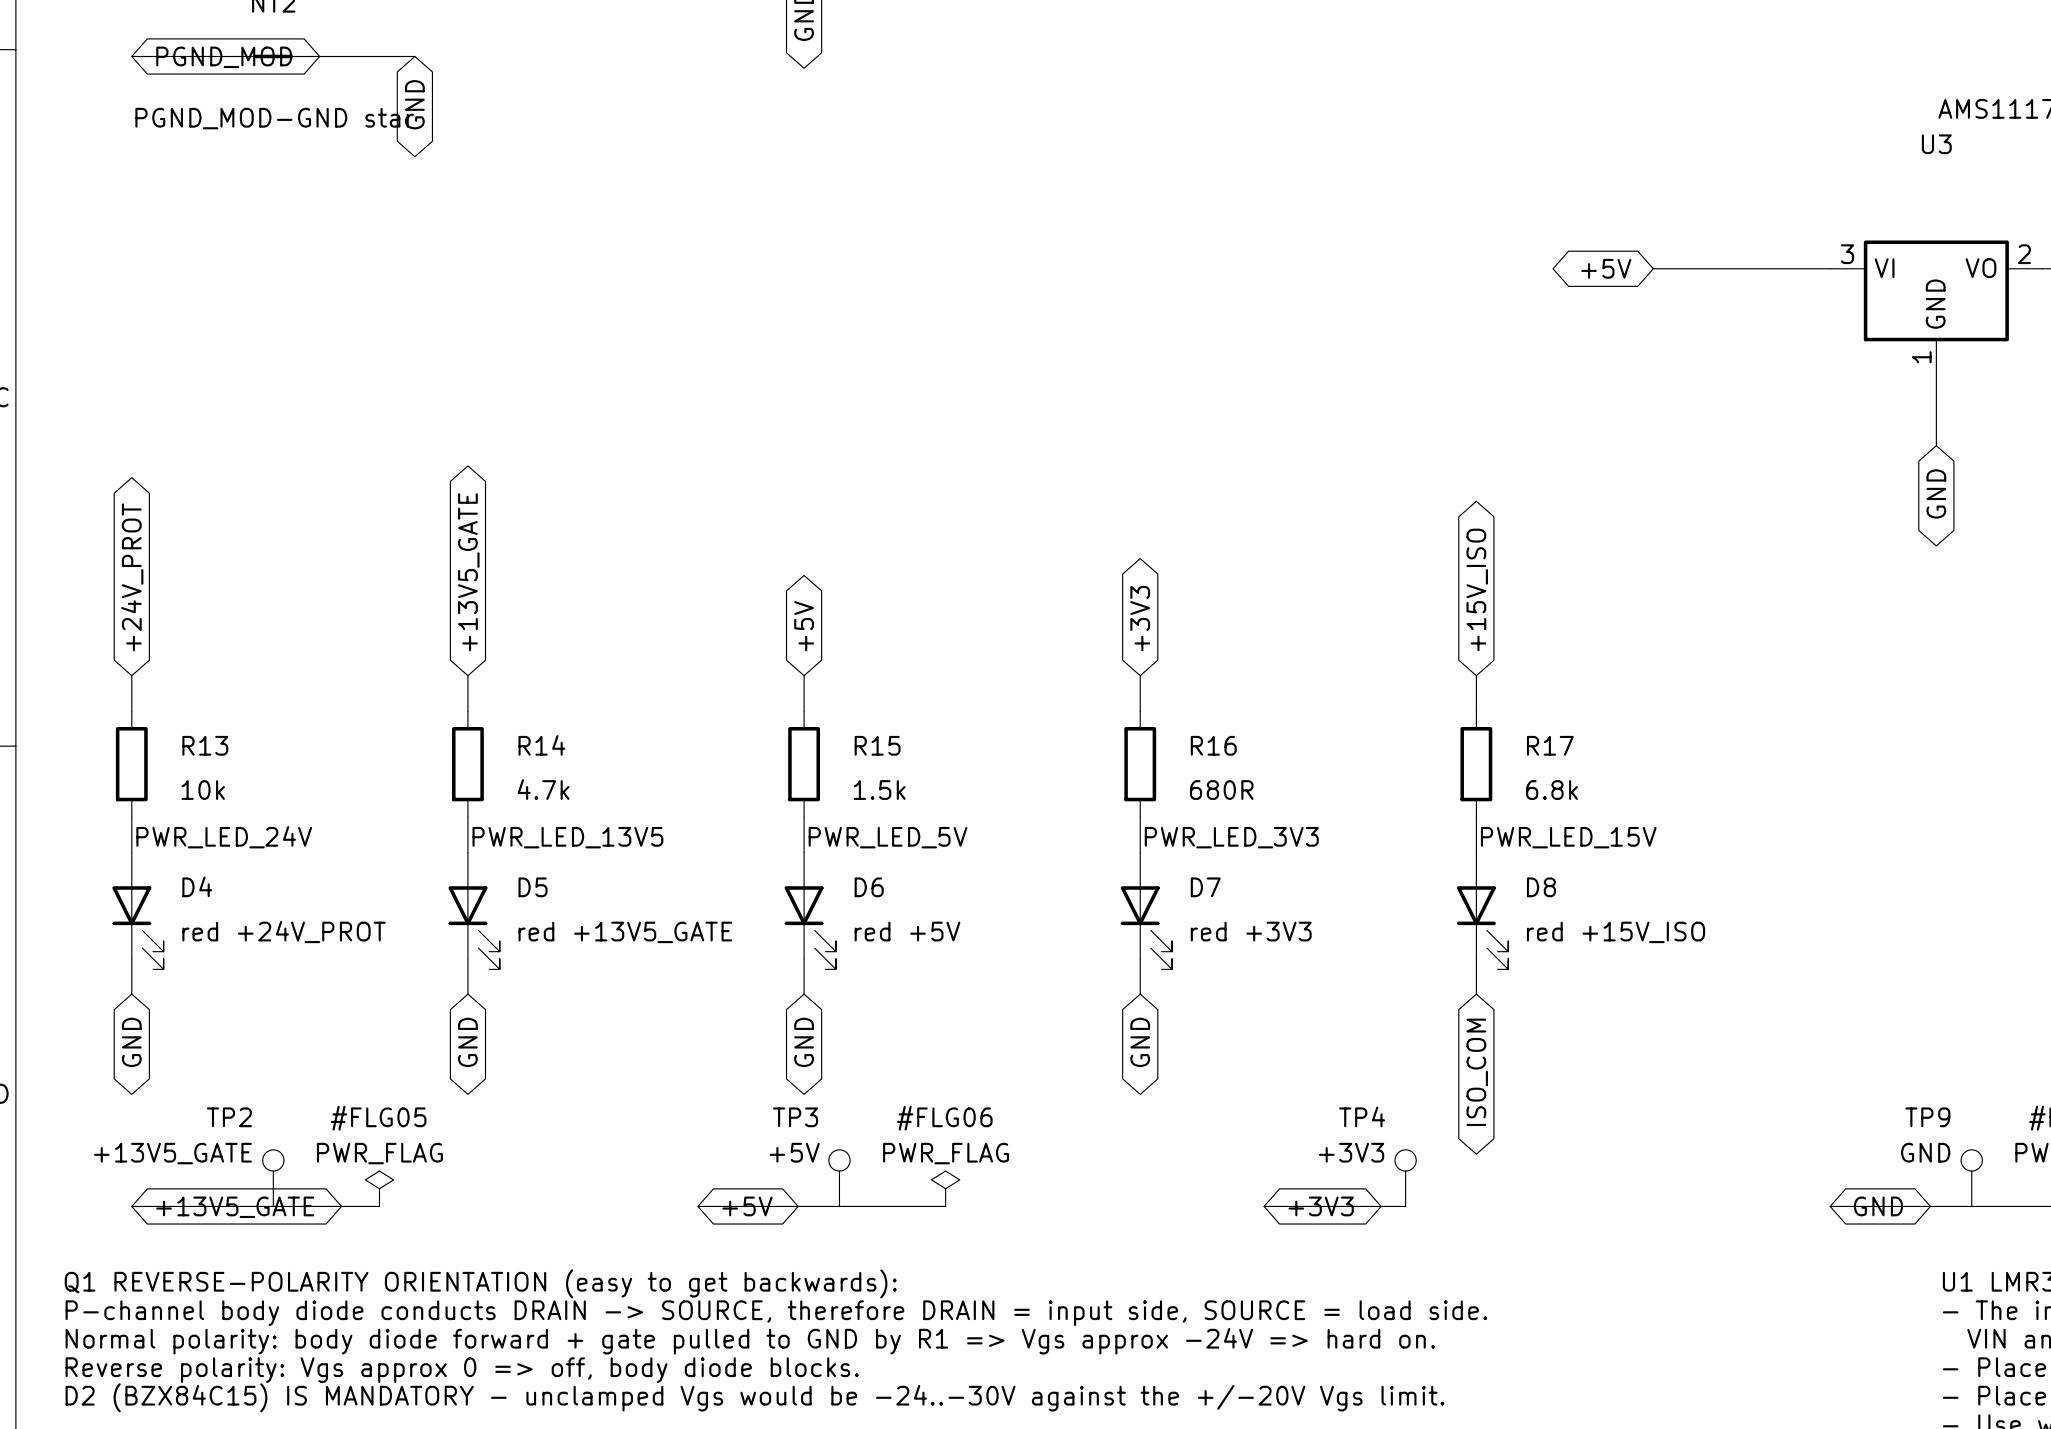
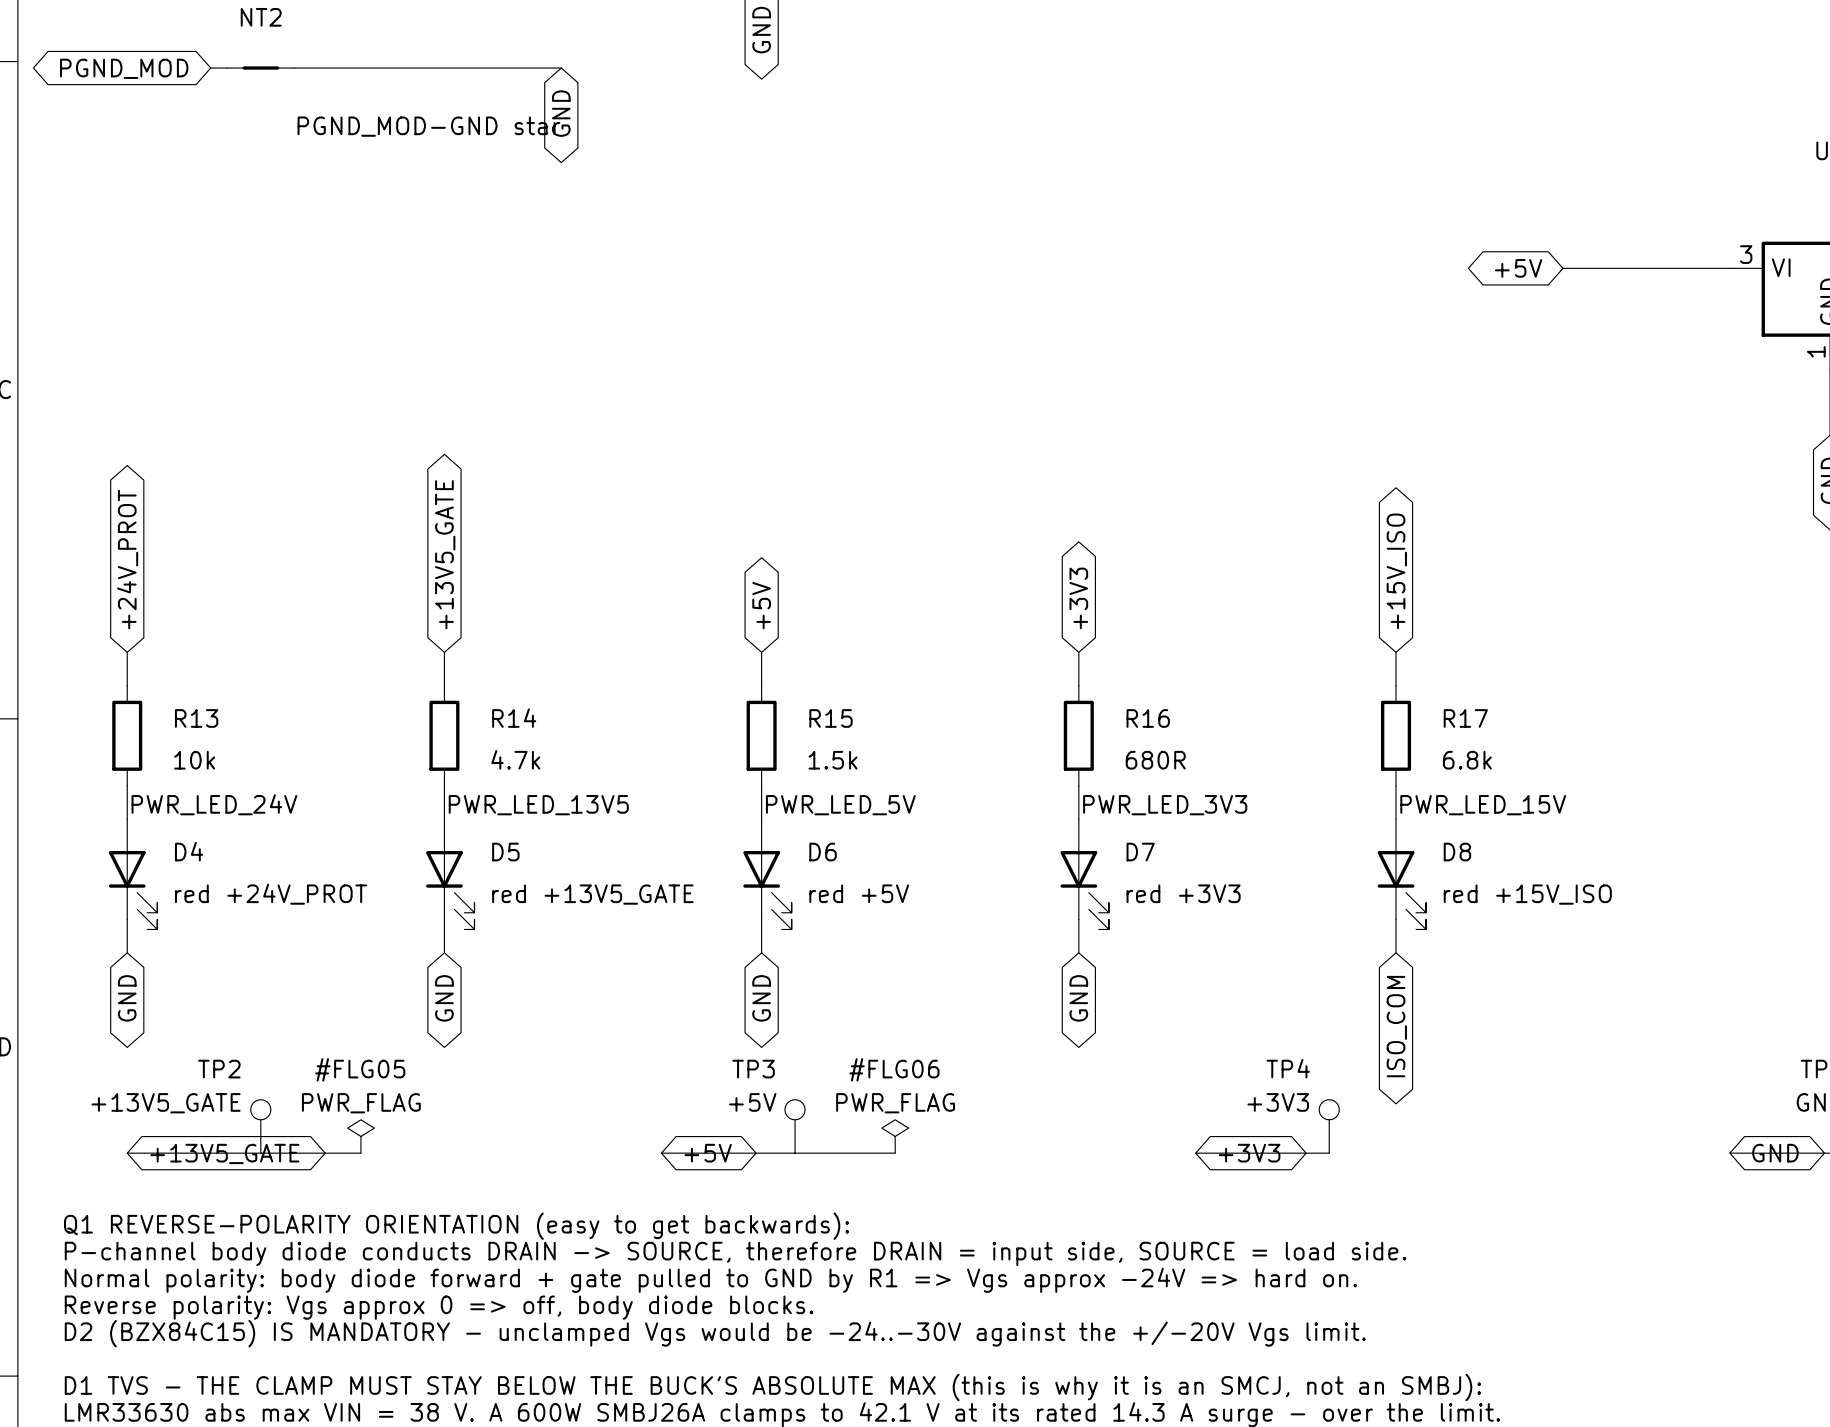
wire: (131, 56) (220, 56) -> none
wire: none -> (394, 68) (561, 68)
global label rotation: 0° (224, 57) -> 180° (124, 68)
global label position: GND (414, 104) -> GND (561, 113)
NT2 value position: PGND_MOD-GND star (274, 118) -> PGND_MOD-GND star (428, 126)

